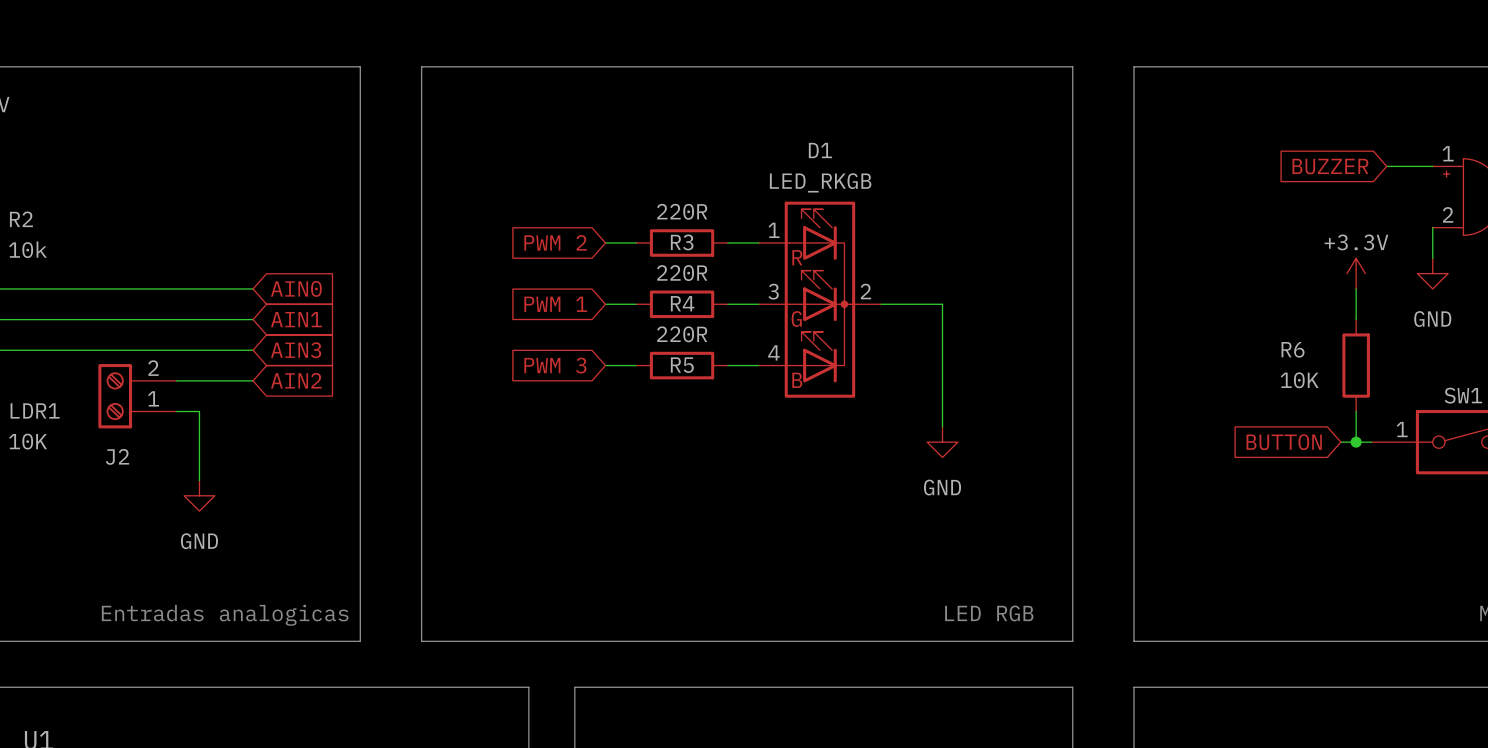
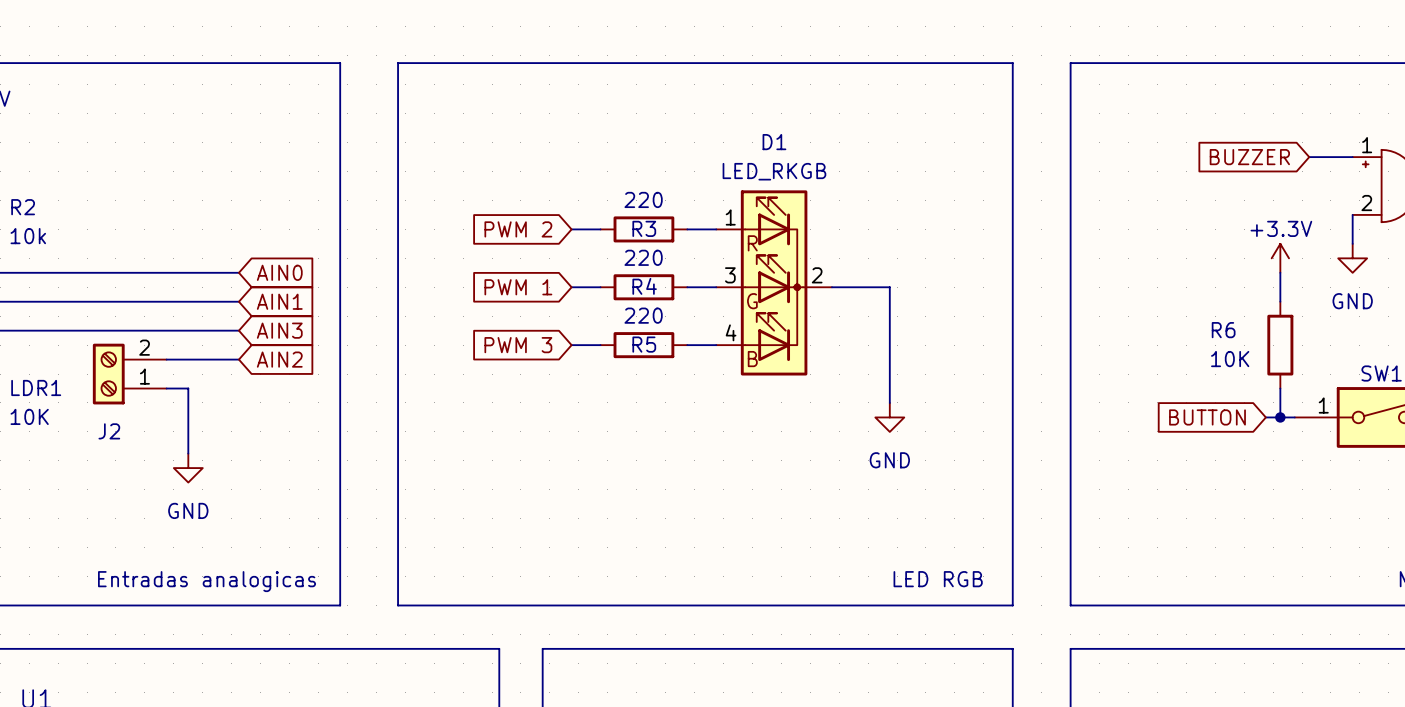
R3 value: 220R (682, 211) -> 220 (643, 199)
R4 value: 220R (682, 273) -> 220 (643, 257)
R5 value: 220R (682, 334) -> 220 (643, 315)

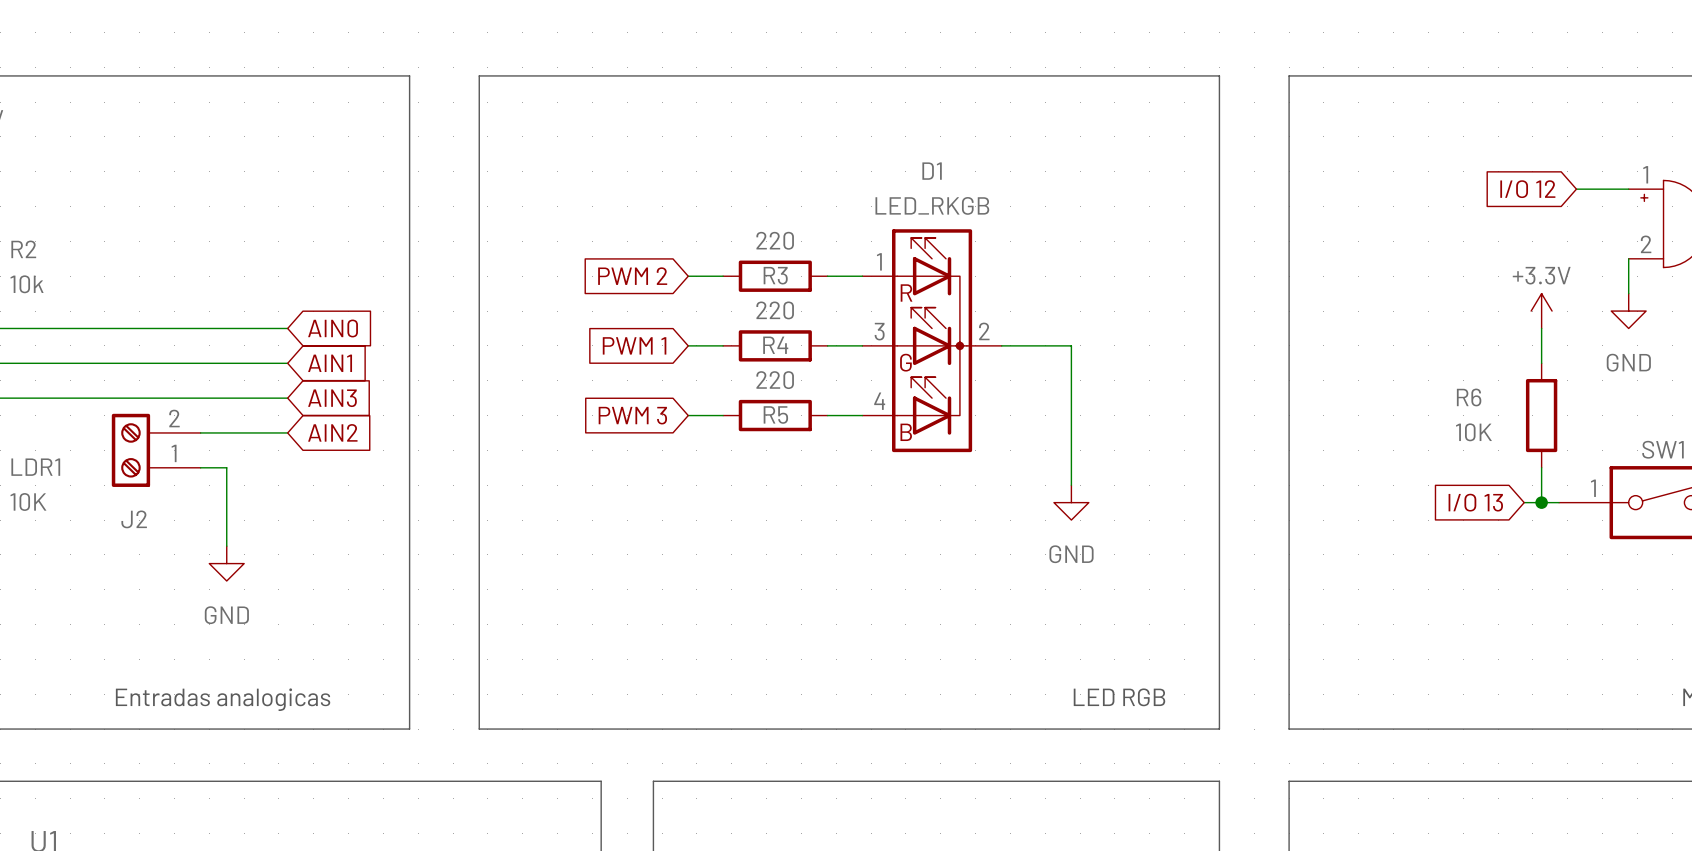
global label: BUZZER (1249, 157) -> I/O 12 (1527, 189)
global label: BUTTON (1207, 417) -> I/O 13 (1475, 502)

